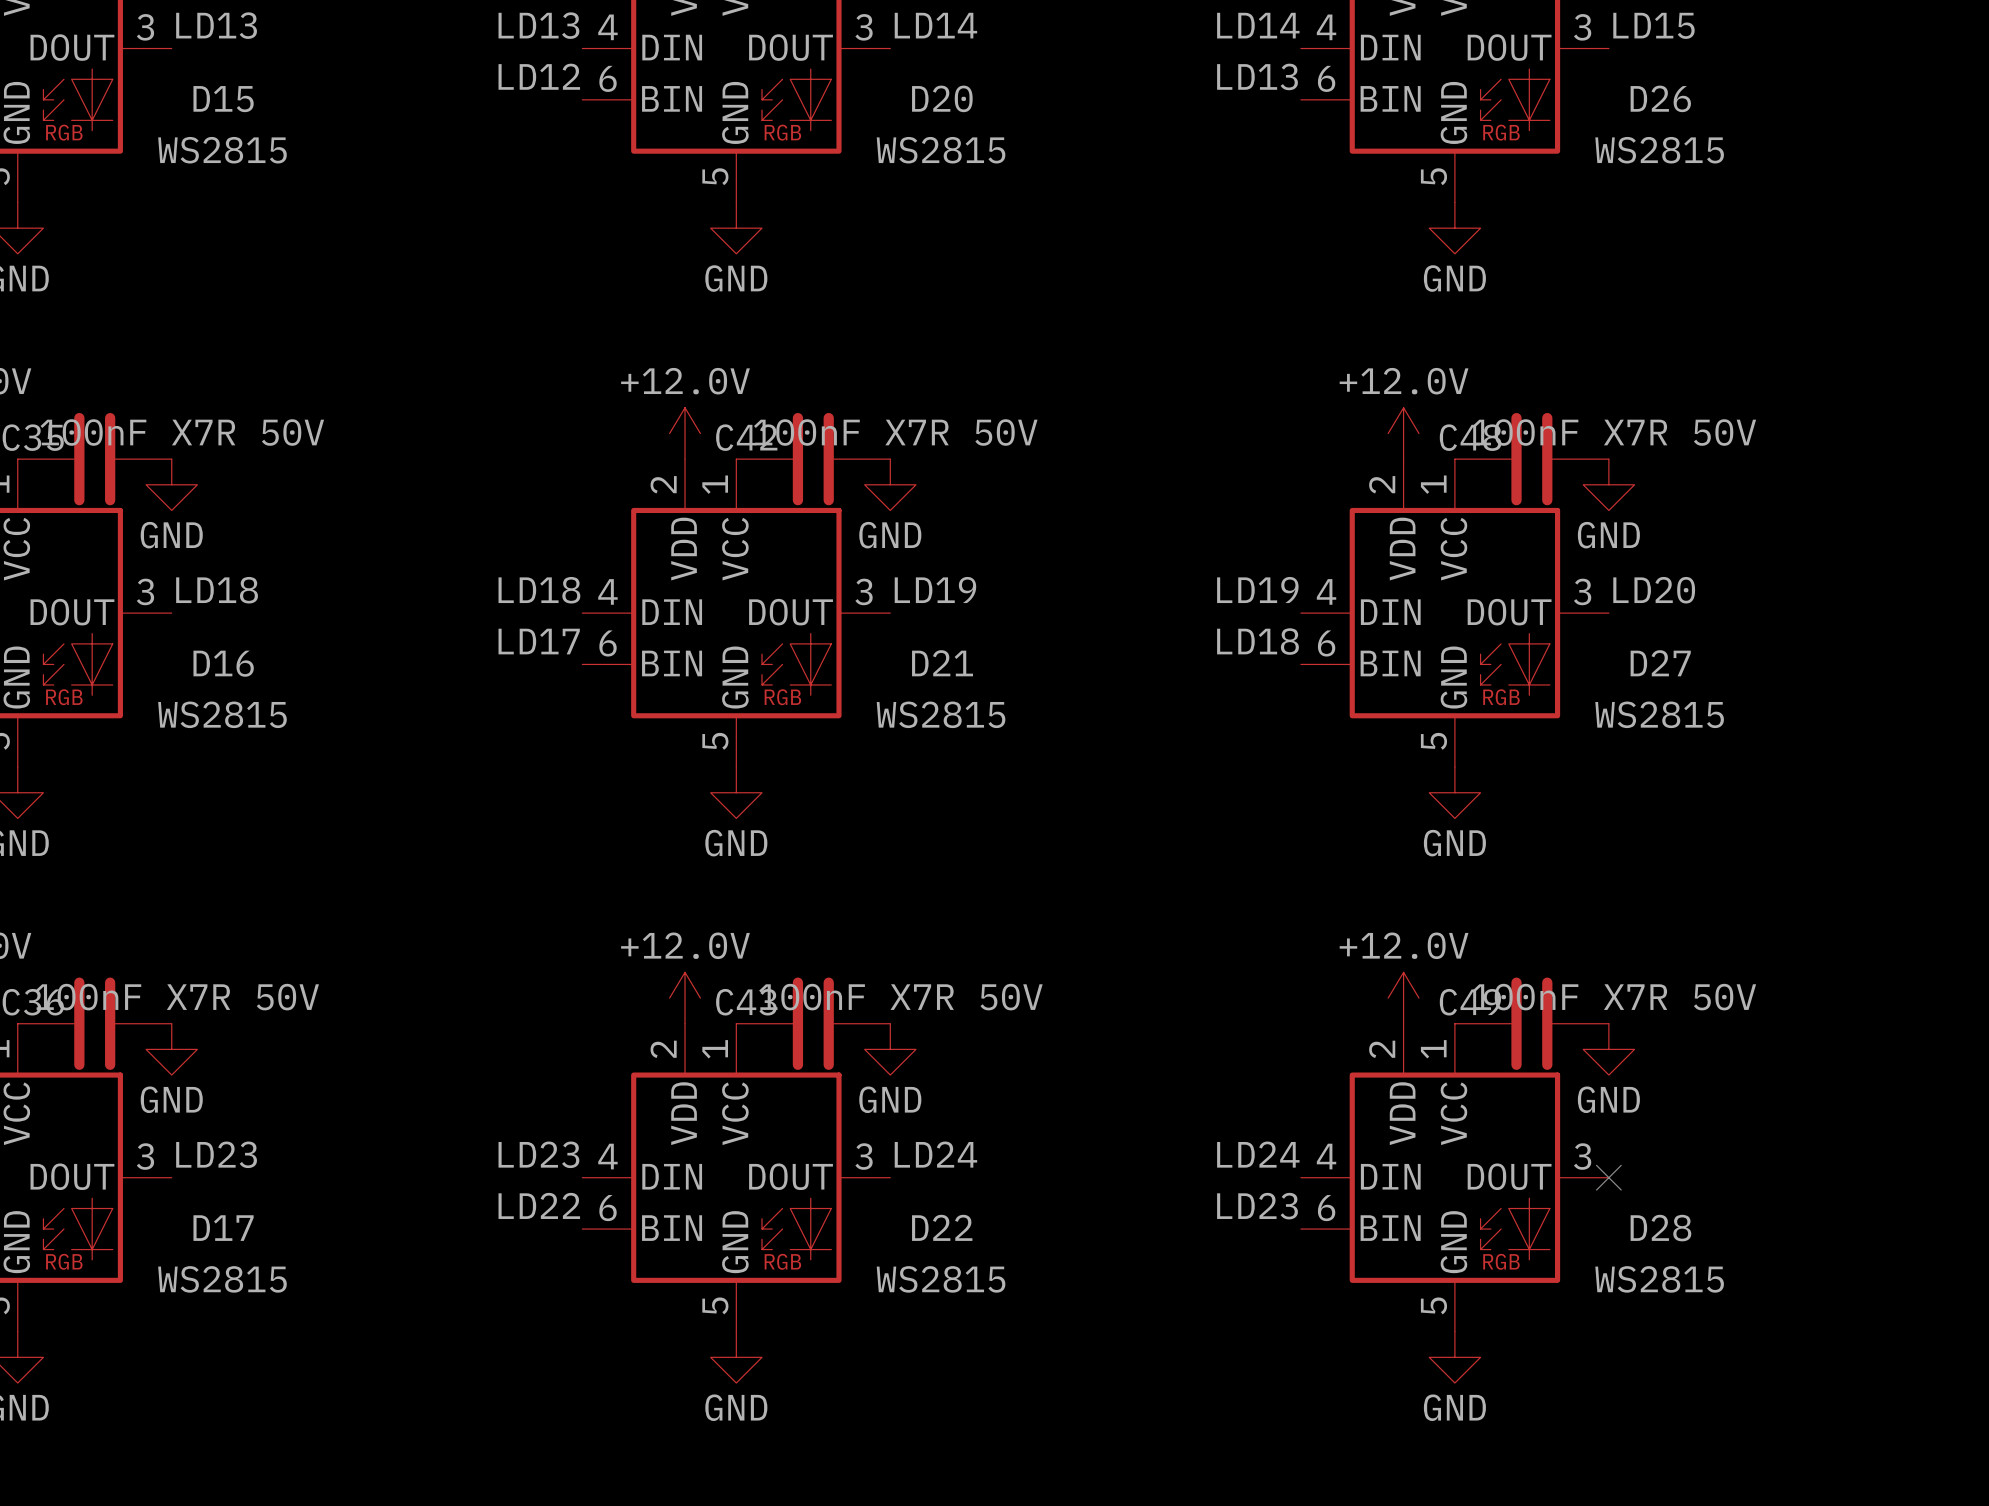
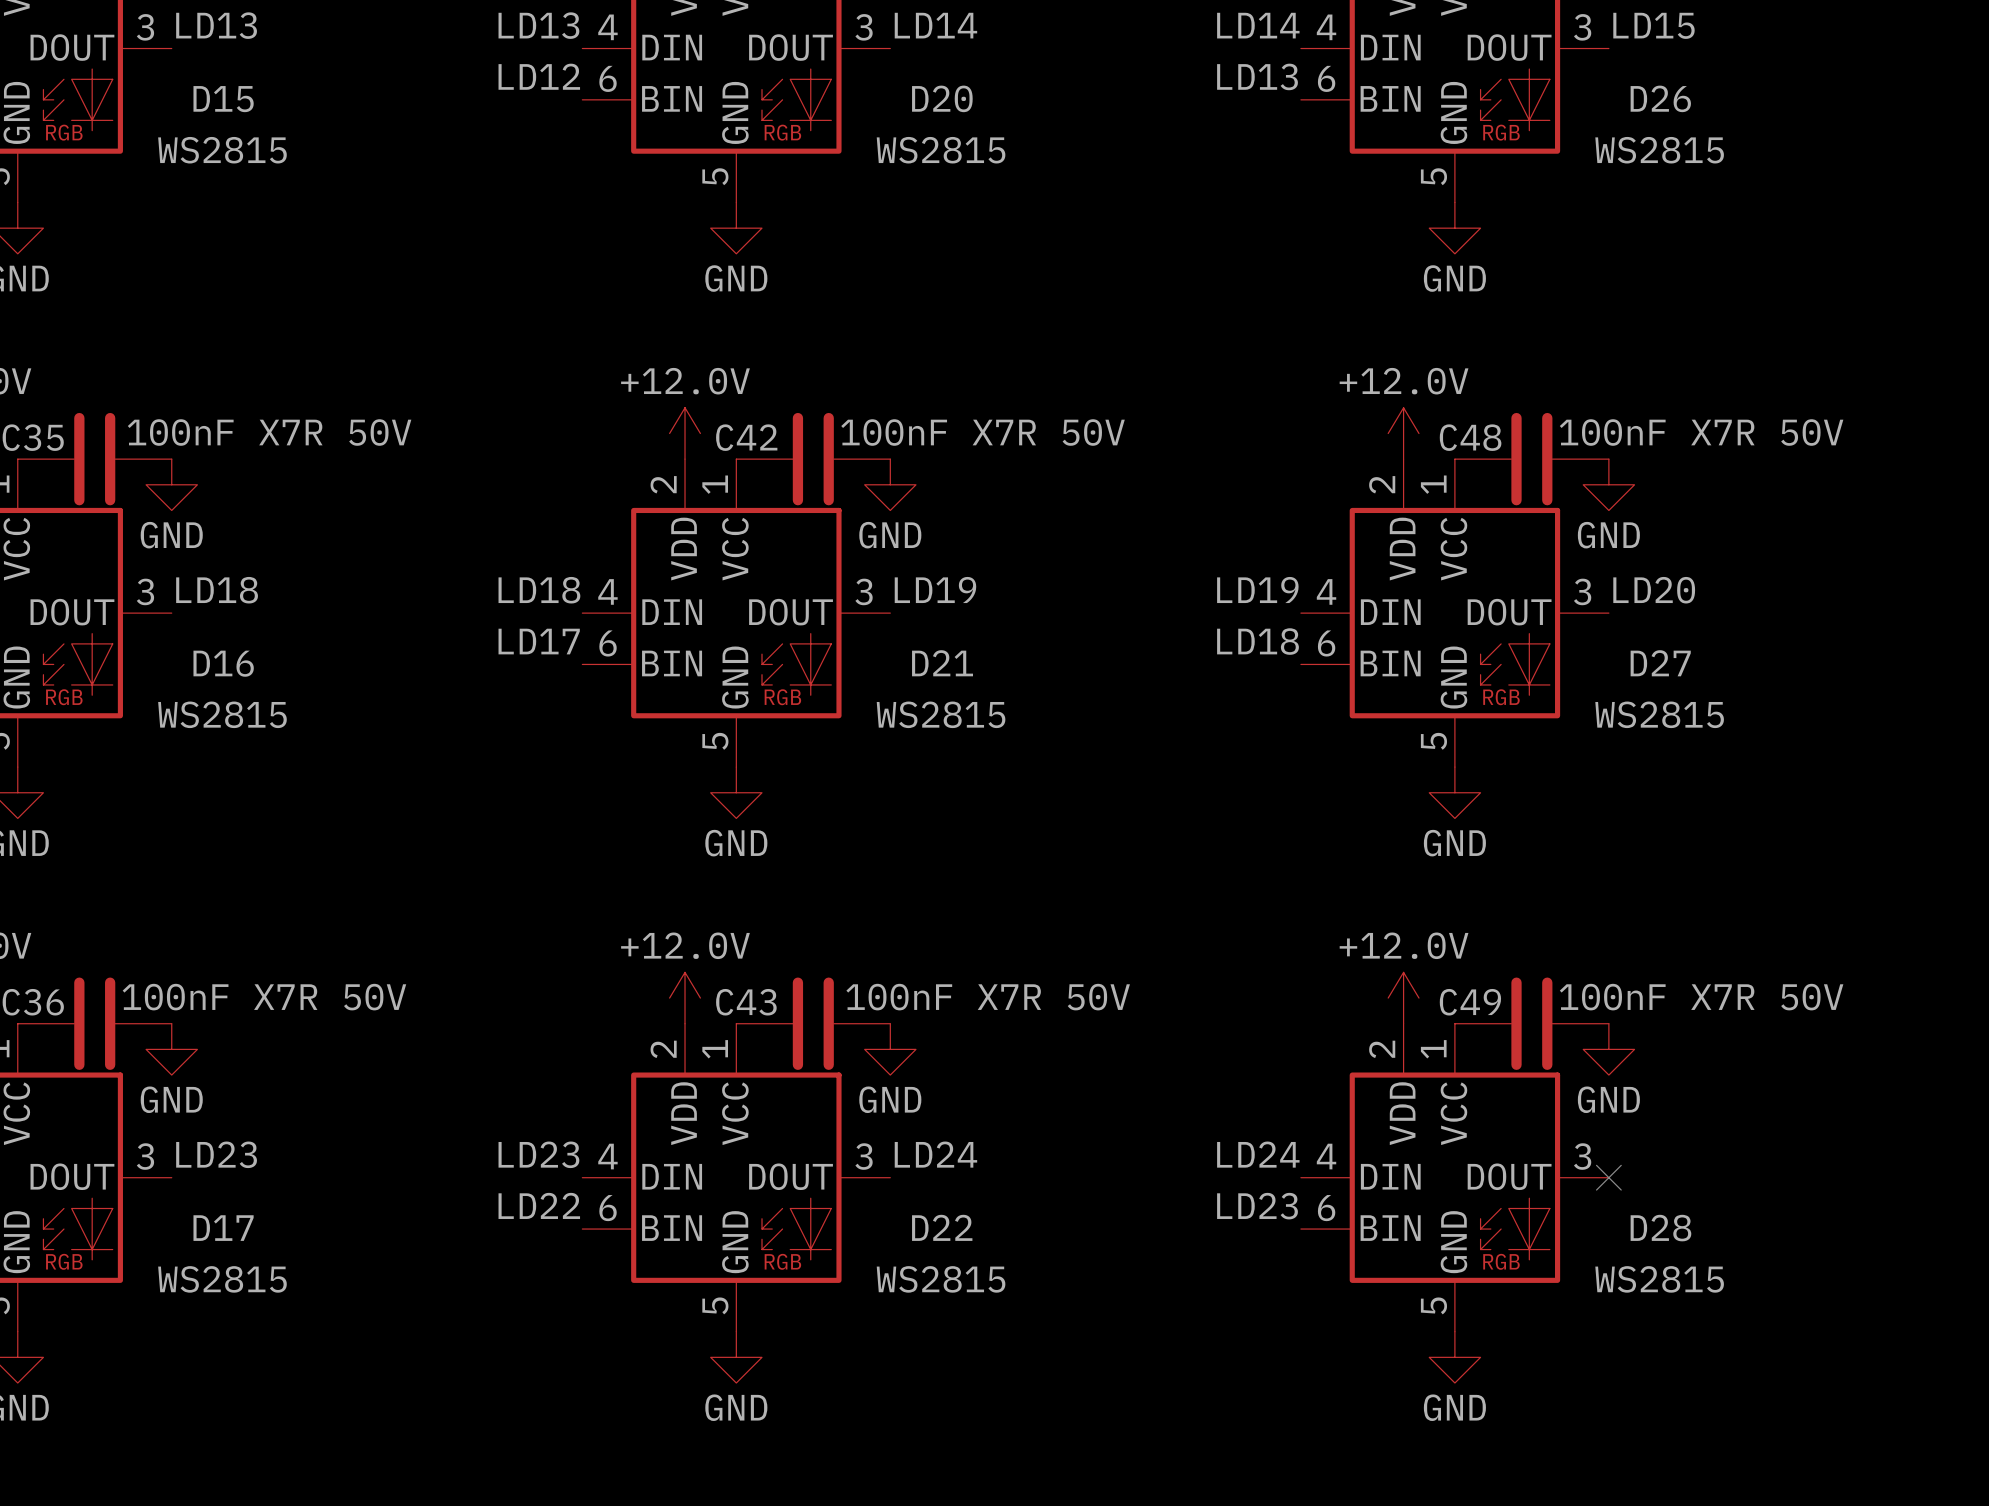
C35 value position: 100nF X7R 50V (182, 432) -> 100nF X7R 50V (269, 432)
C42 value position: 100nF X7R 50V (895, 432) -> 100nF X7R 50V (983, 432)
C48 value position: 100nF X7R 50V (1614, 432) -> 100nF X7R 50V (1701, 432)
C36 value position: 100nF X7R 50V (177, 997) -> 100nF X7R 50V (264, 997)
C43 value position: 100nF X7R 50V (900, 997) -> 100nF X7R 50V (988, 997)
C49 value position: 100nF X7R 50V (1614, 997) -> 100nF X7R 50V (1701, 997)

